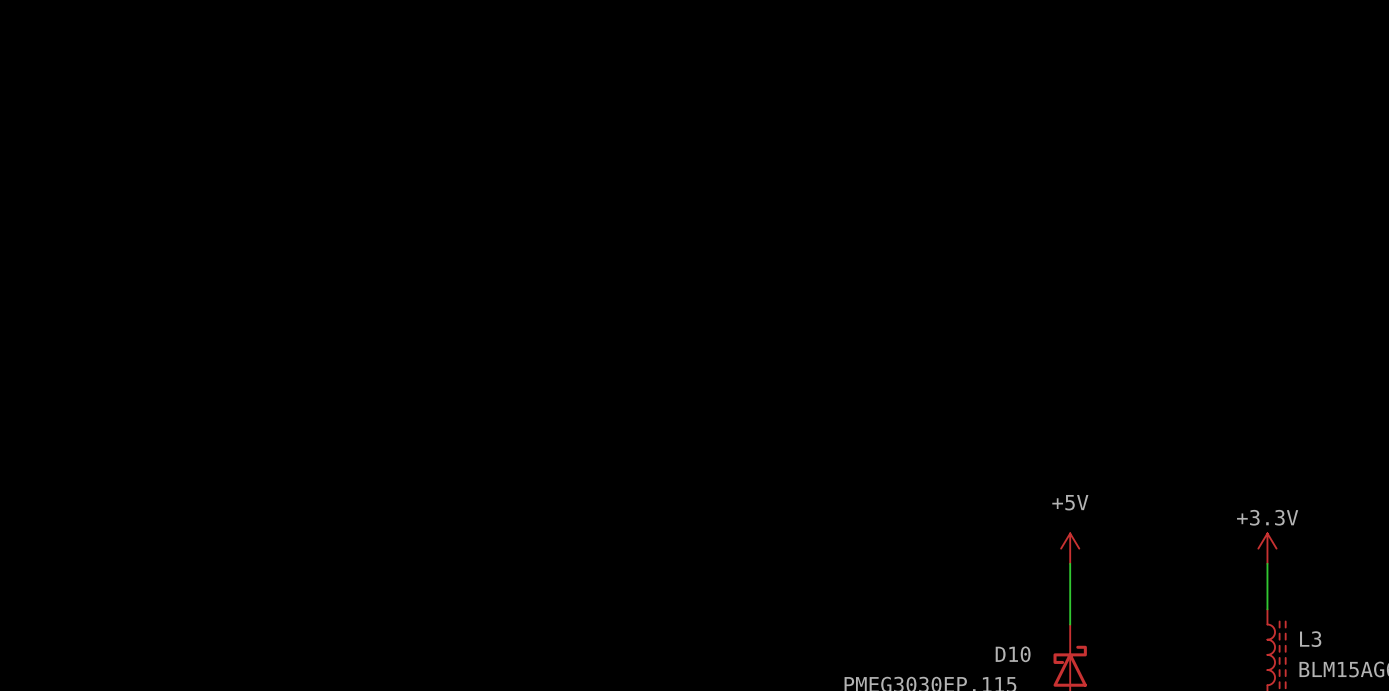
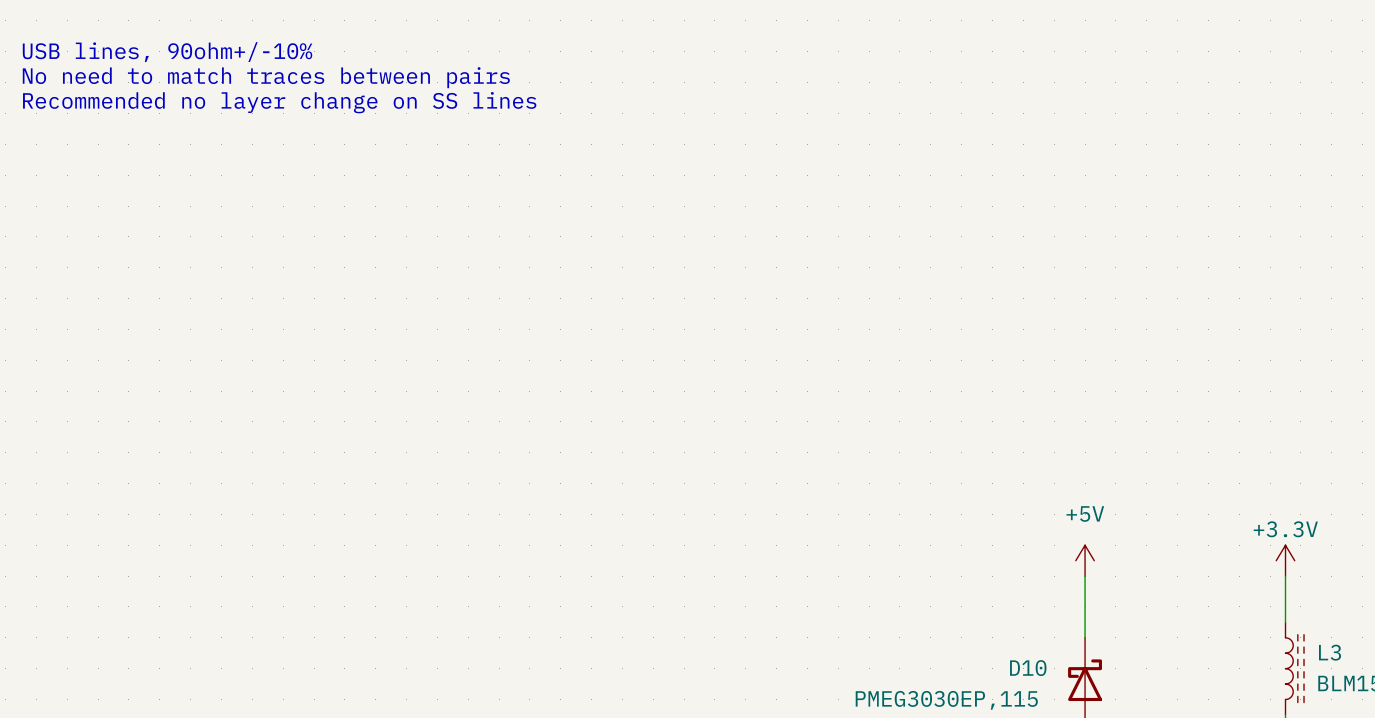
text: none -> USB lines, 90ohm+/-10% (167, 52)
text: none -> No need to match traces between pairs (266, 77)
text: none -> Recommended no layer change on SS lines (279, 102)

